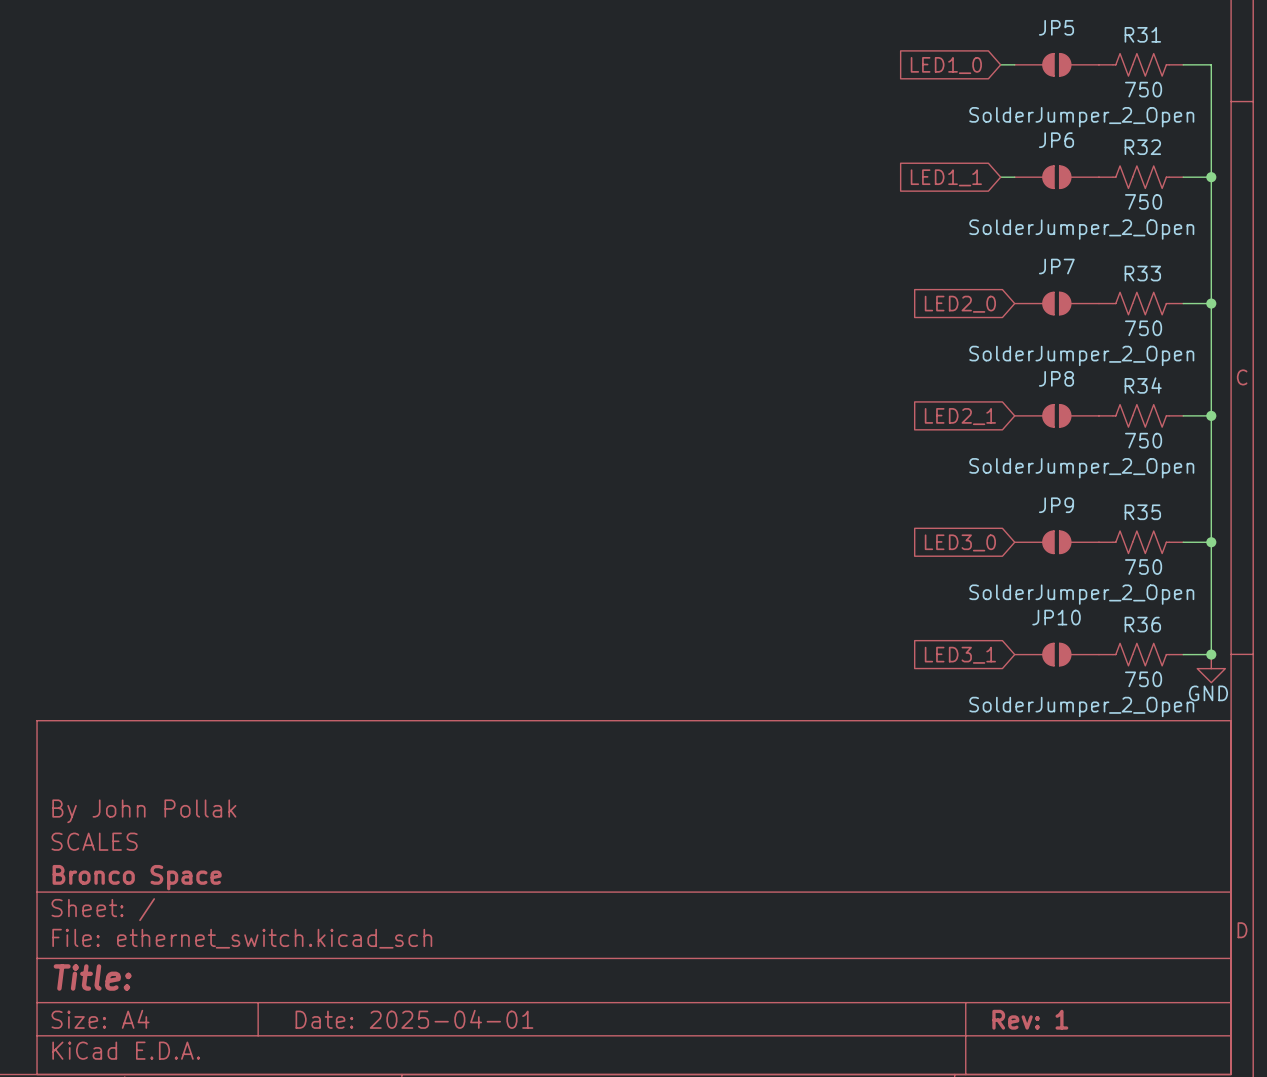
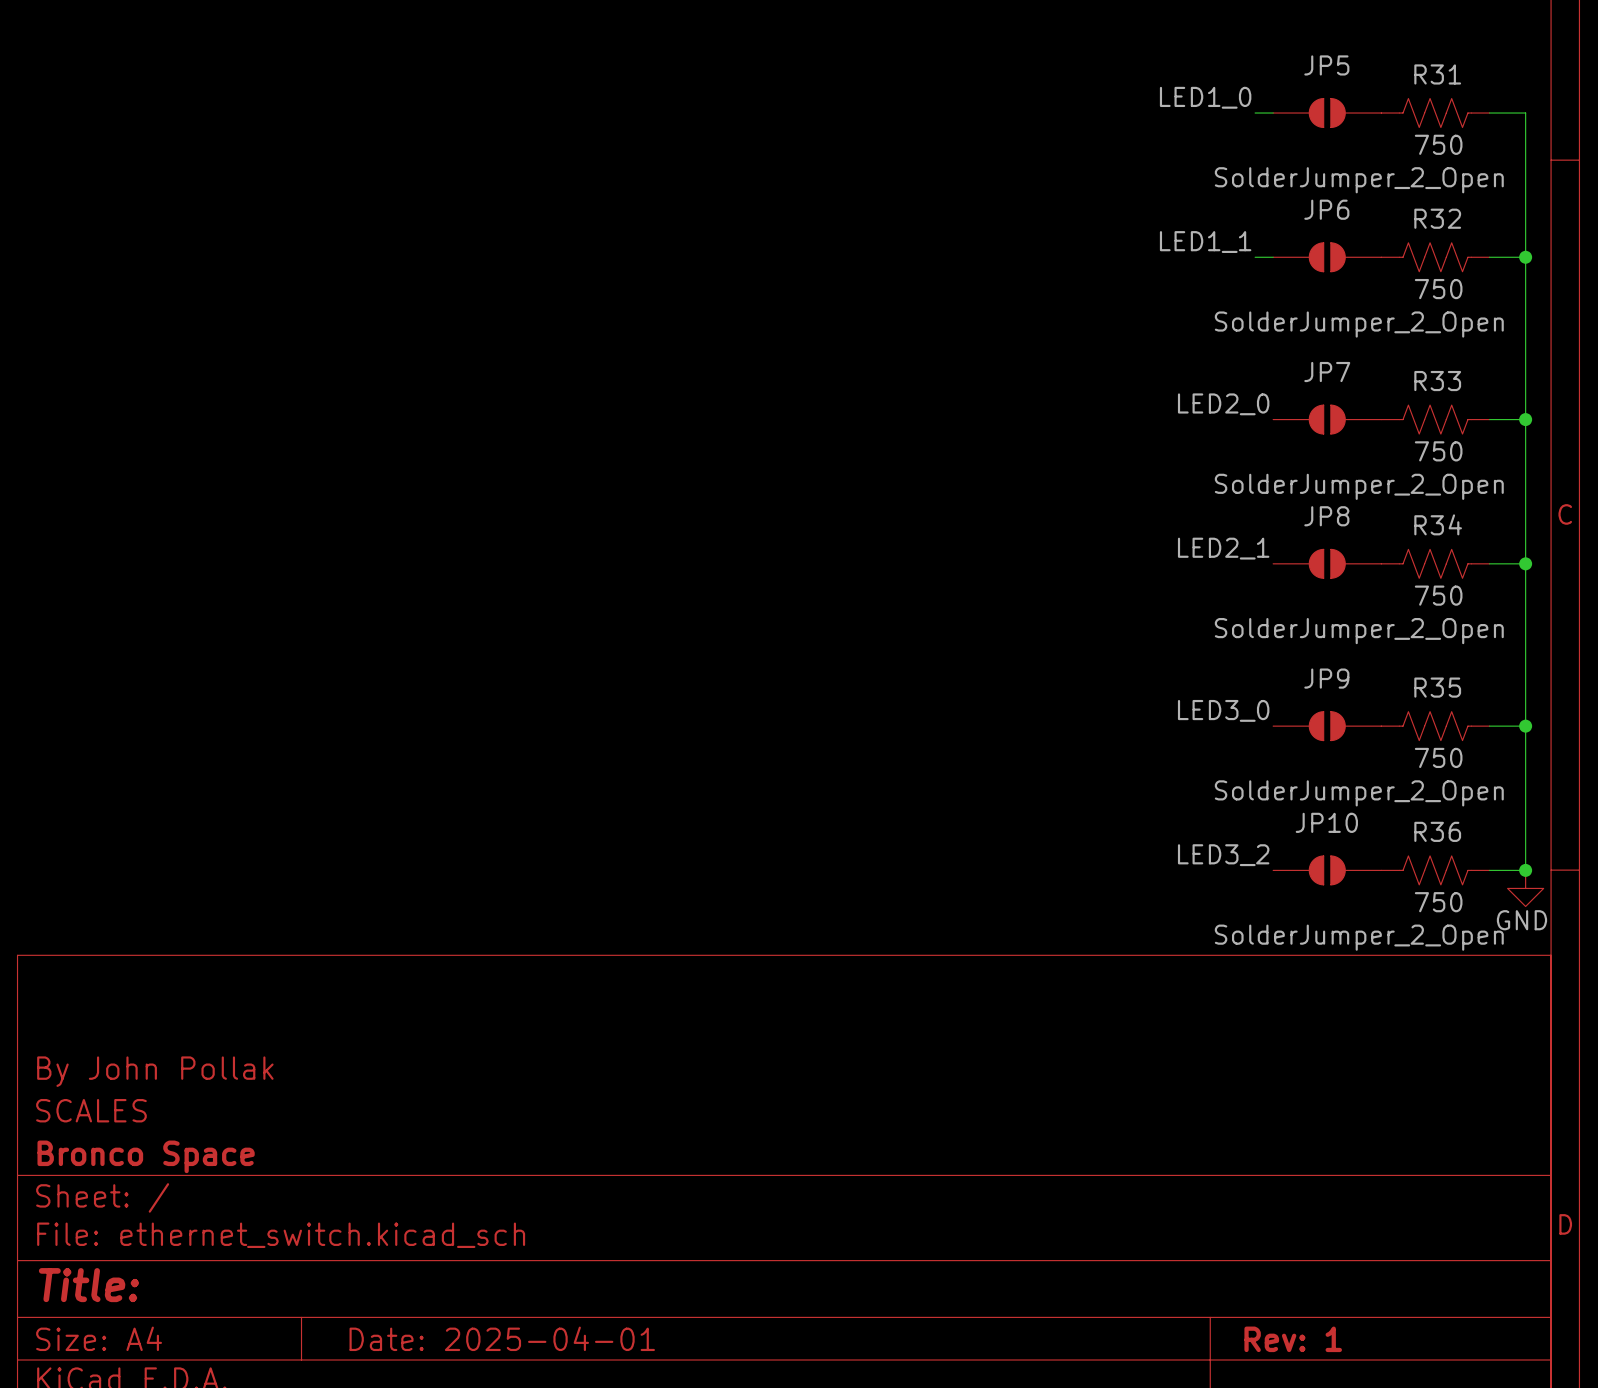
label: none -> LED1_0 (1205, 97)
global label: LED1_0 (946, 65) -> none
label: none -> LED1_1 (1205, 242)
global label: LED1_1 (946, 177) -> none
label: none -> LED2_0 (1223, 404)
global label: LED2_0 (960, 304) -> none
label: none -> LED2_1 (1223, 548)
global label: LED2_1 (960, 416) -> none
label: none -> LED3_0 (1223, 710)
global label: LED3_0 (960, 542) -> none
label: none -> LED3_2 (1223, 855)
global label: LED3_1 (960, 655) -> none

